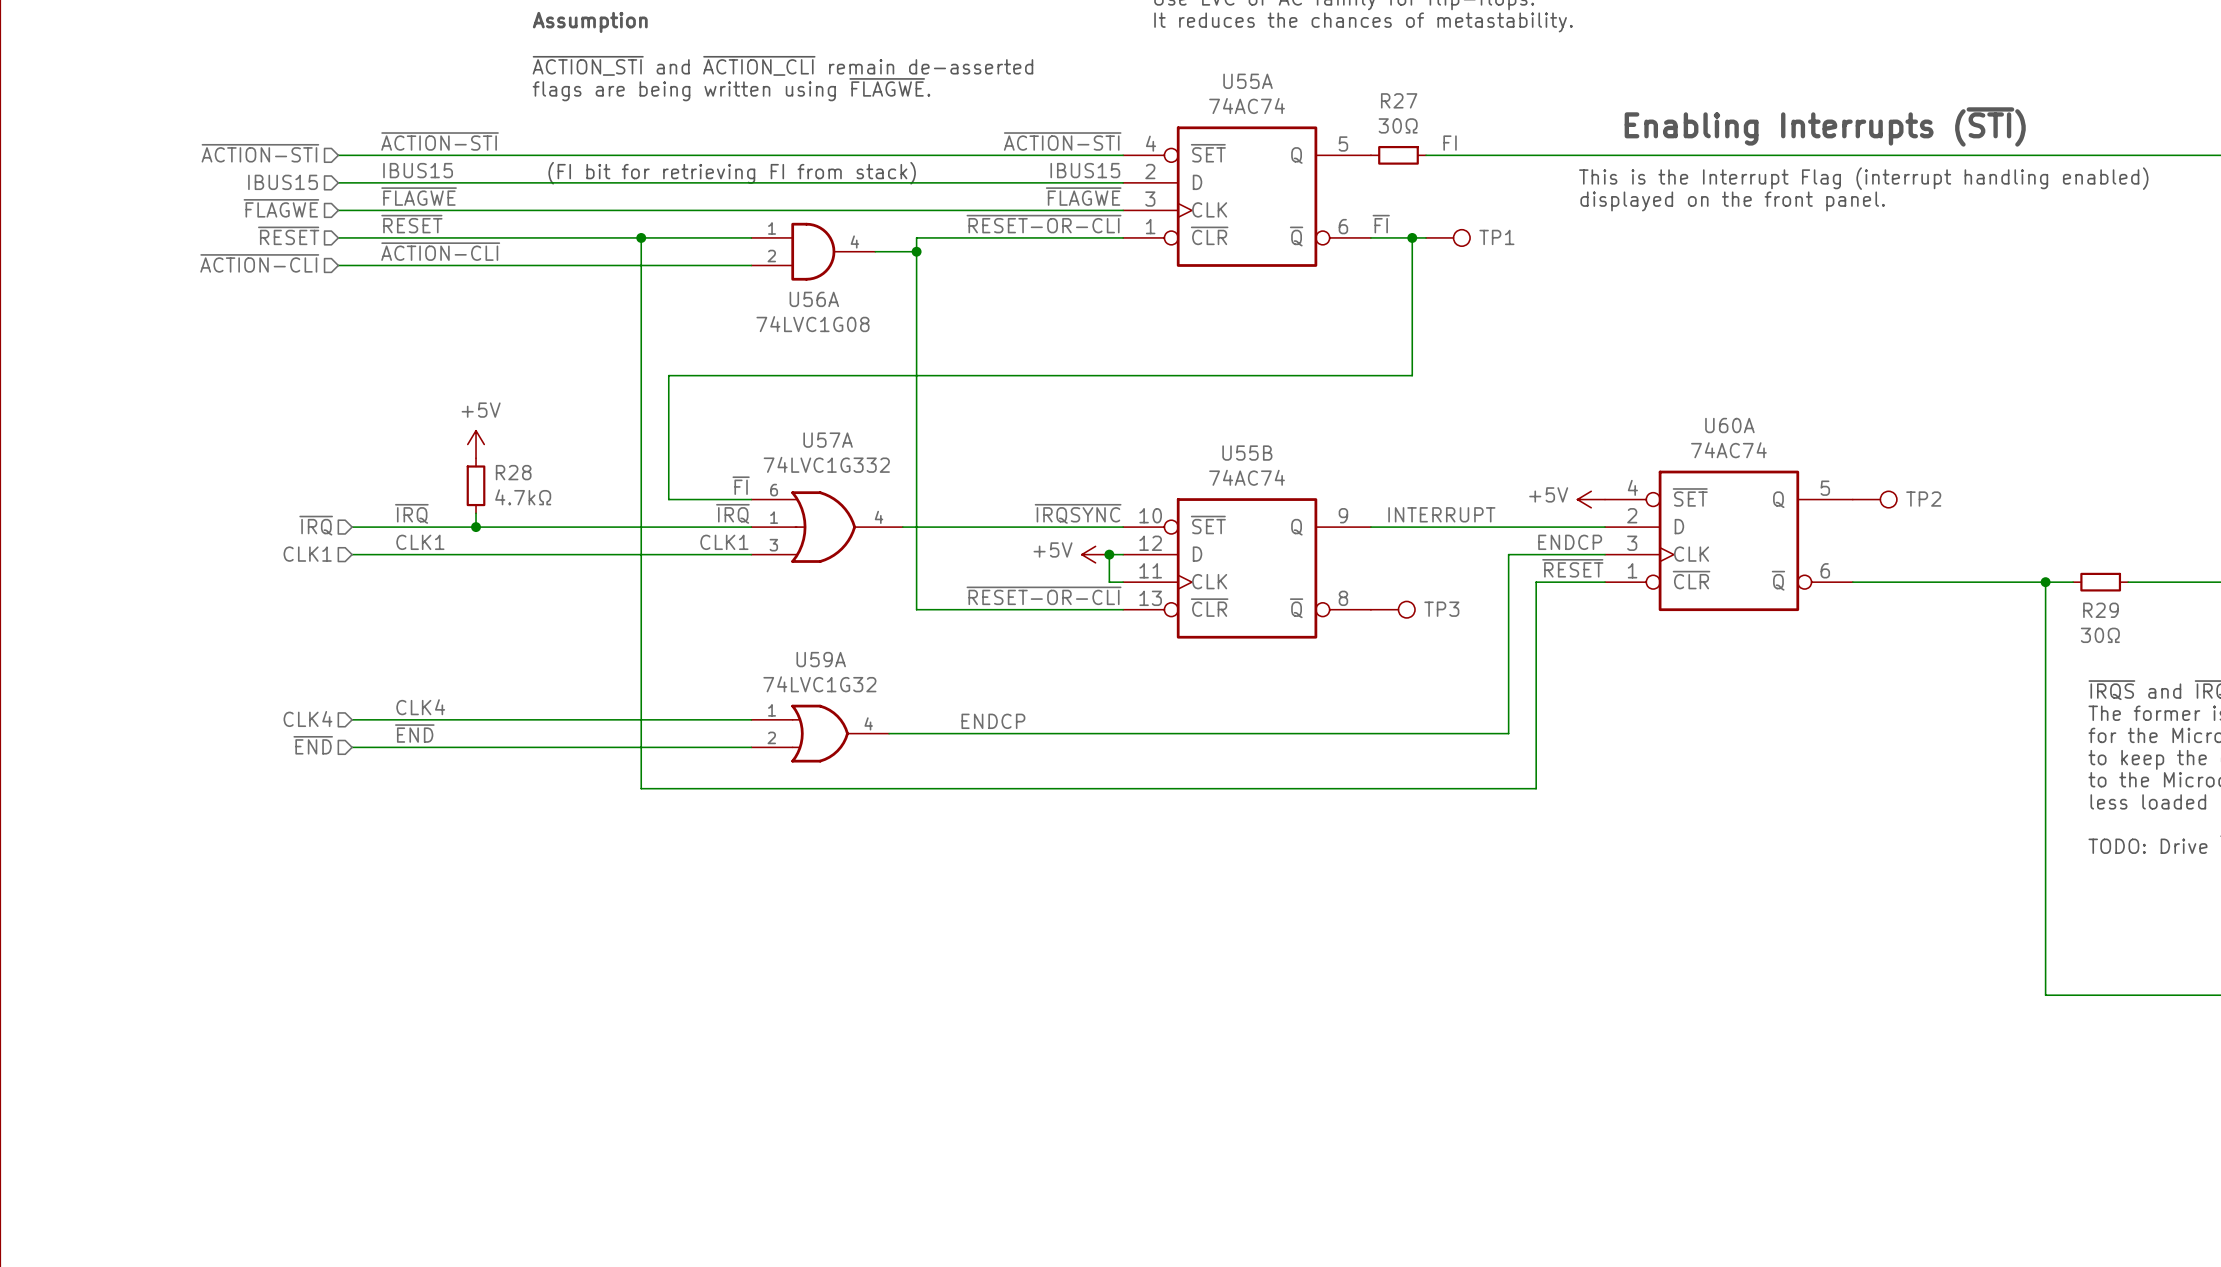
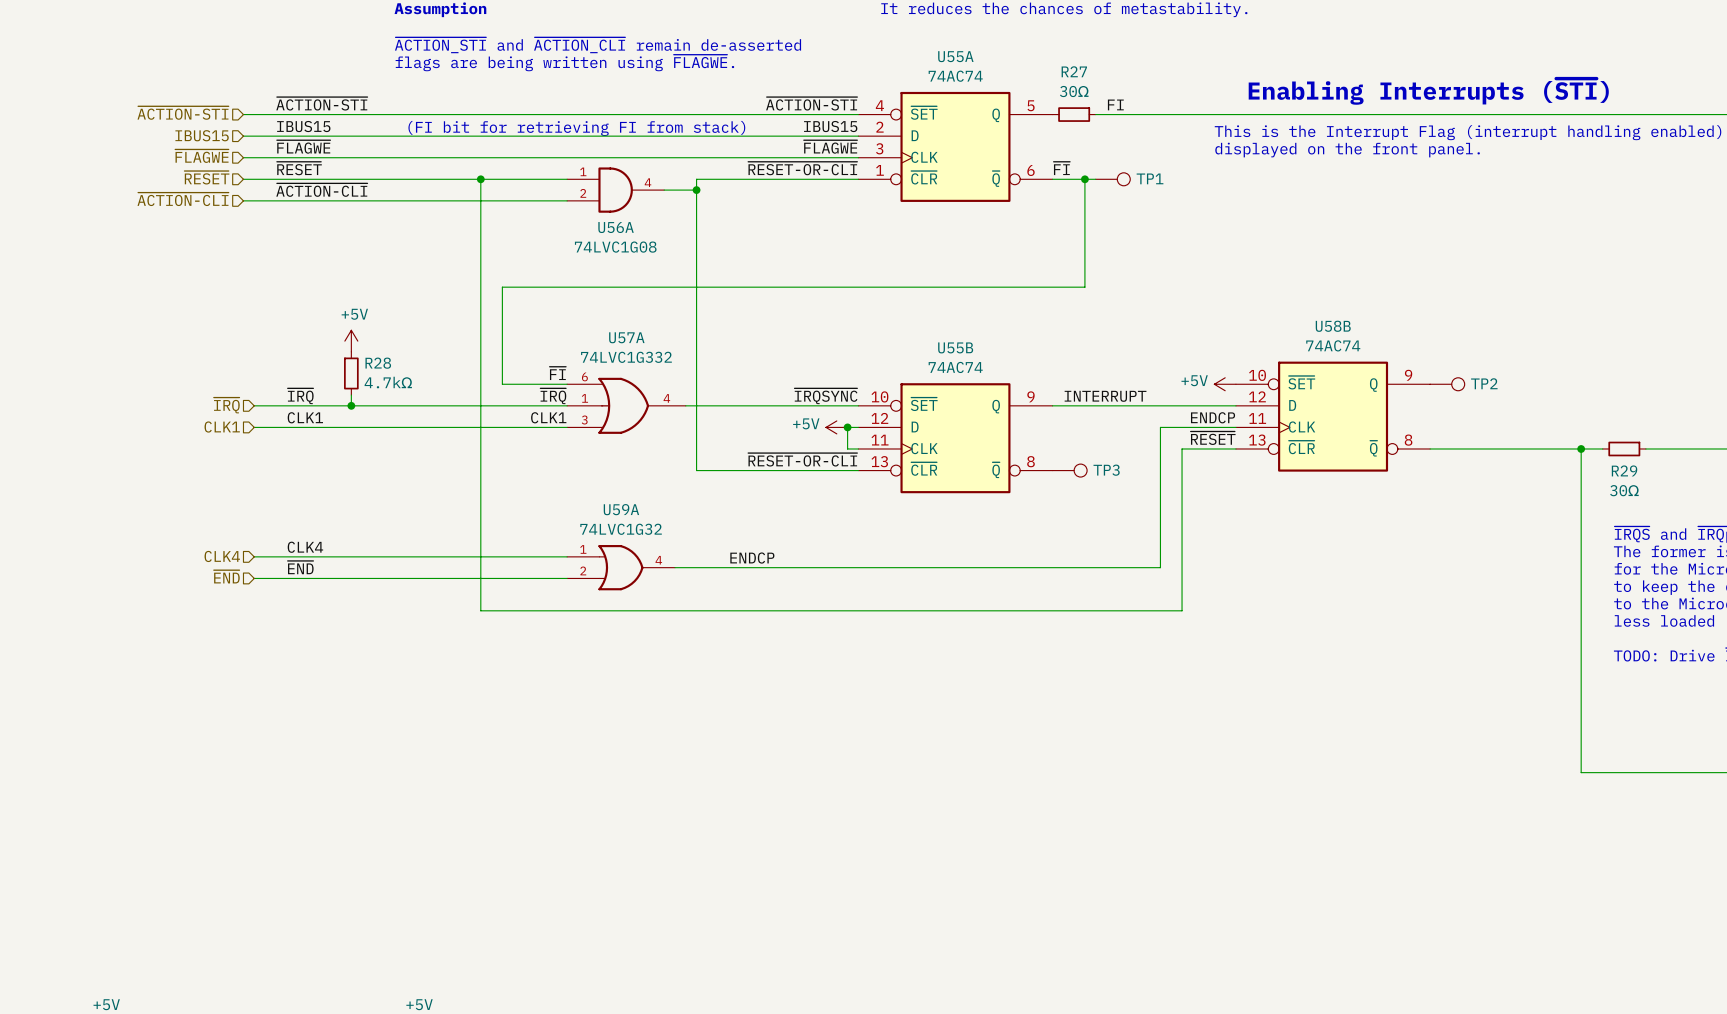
U60A name: U60A (1729, 425) -> U58B (1333, 326)
U60A pin number: 4 (1632, 487) -> 10 (1257, 375)
U60A pin number: 5 (1825, 488) -> 9 (1408, 375)
U60A pin number: 2 (1632, 515) -> 12 (1257, 396)
U60A pin number: 3 (1632, 543) -> 11 (1257, 418)
U60A pin number: 1 (1632, 570) -> 13 (1257, 440)
U60A pin number: 6 (1825, 570) -> 8 (1408, 440)

